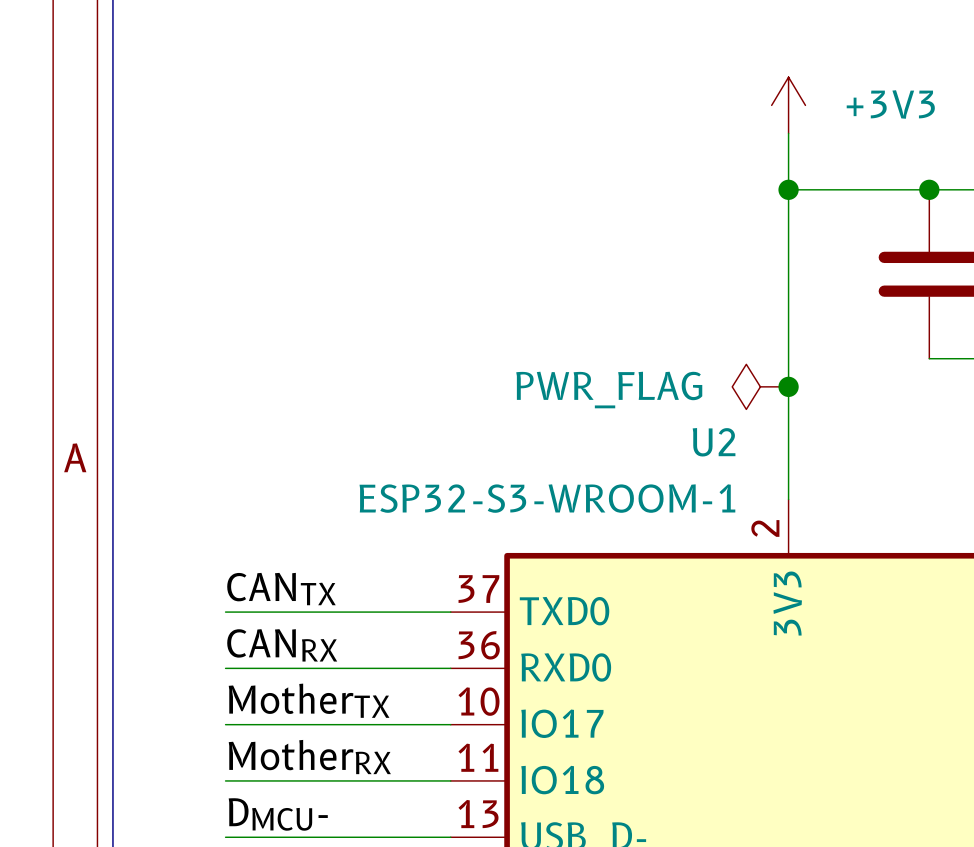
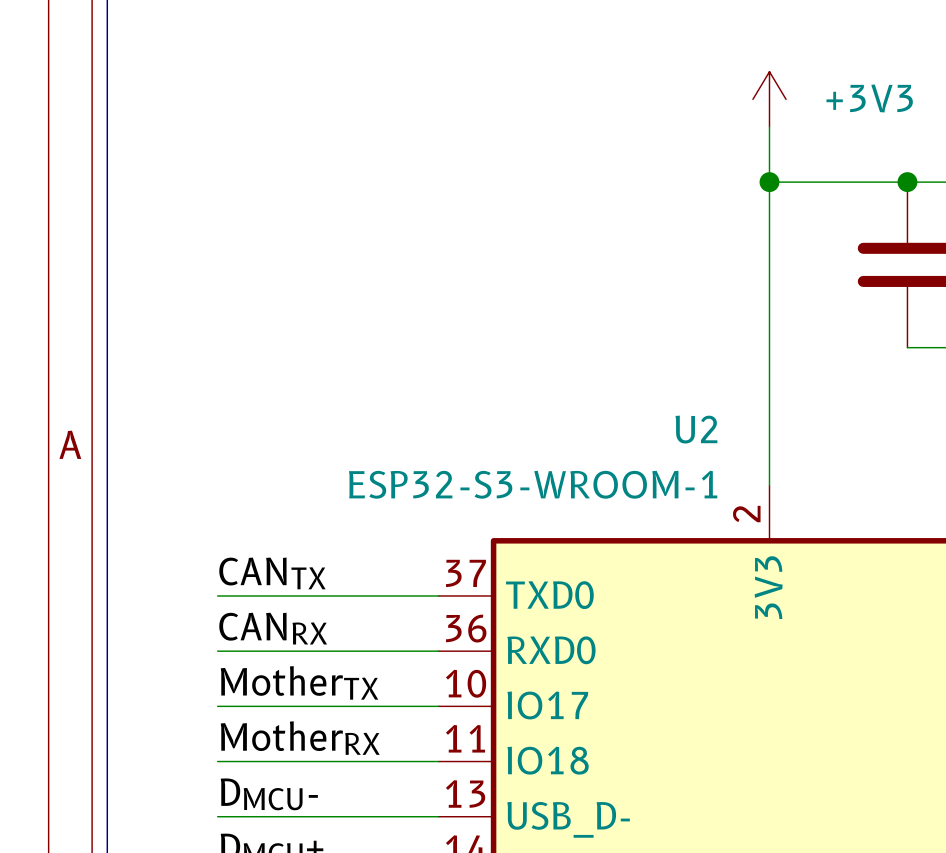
power symbol: PWR_FLAG (760, 386) -> none
junction: (788, 386) -> none

